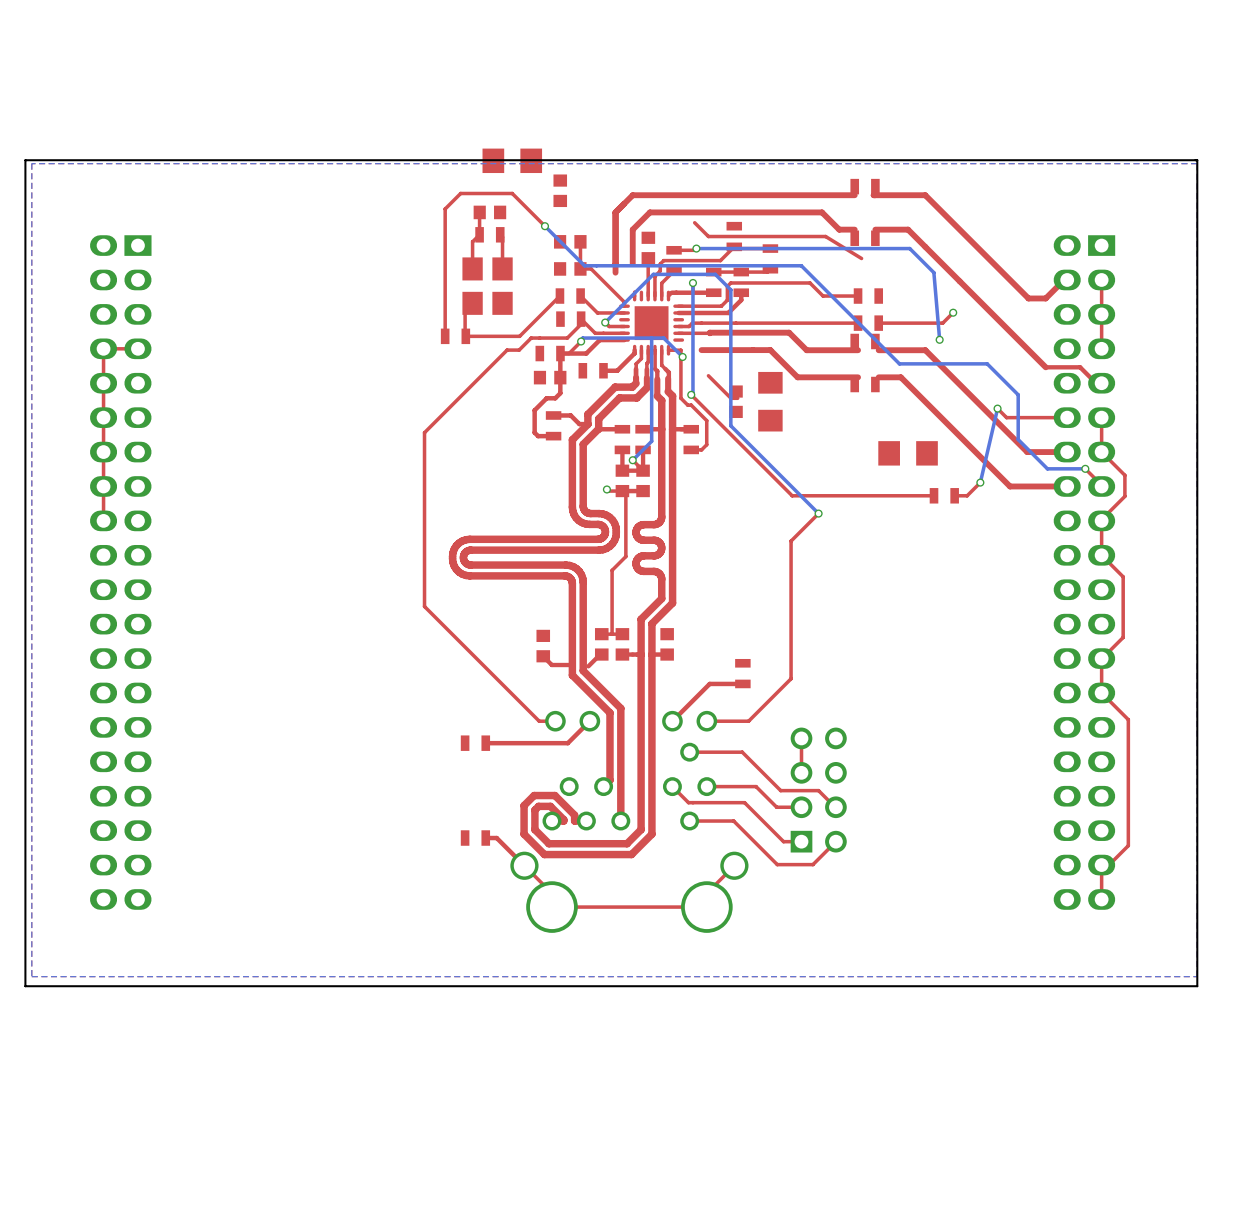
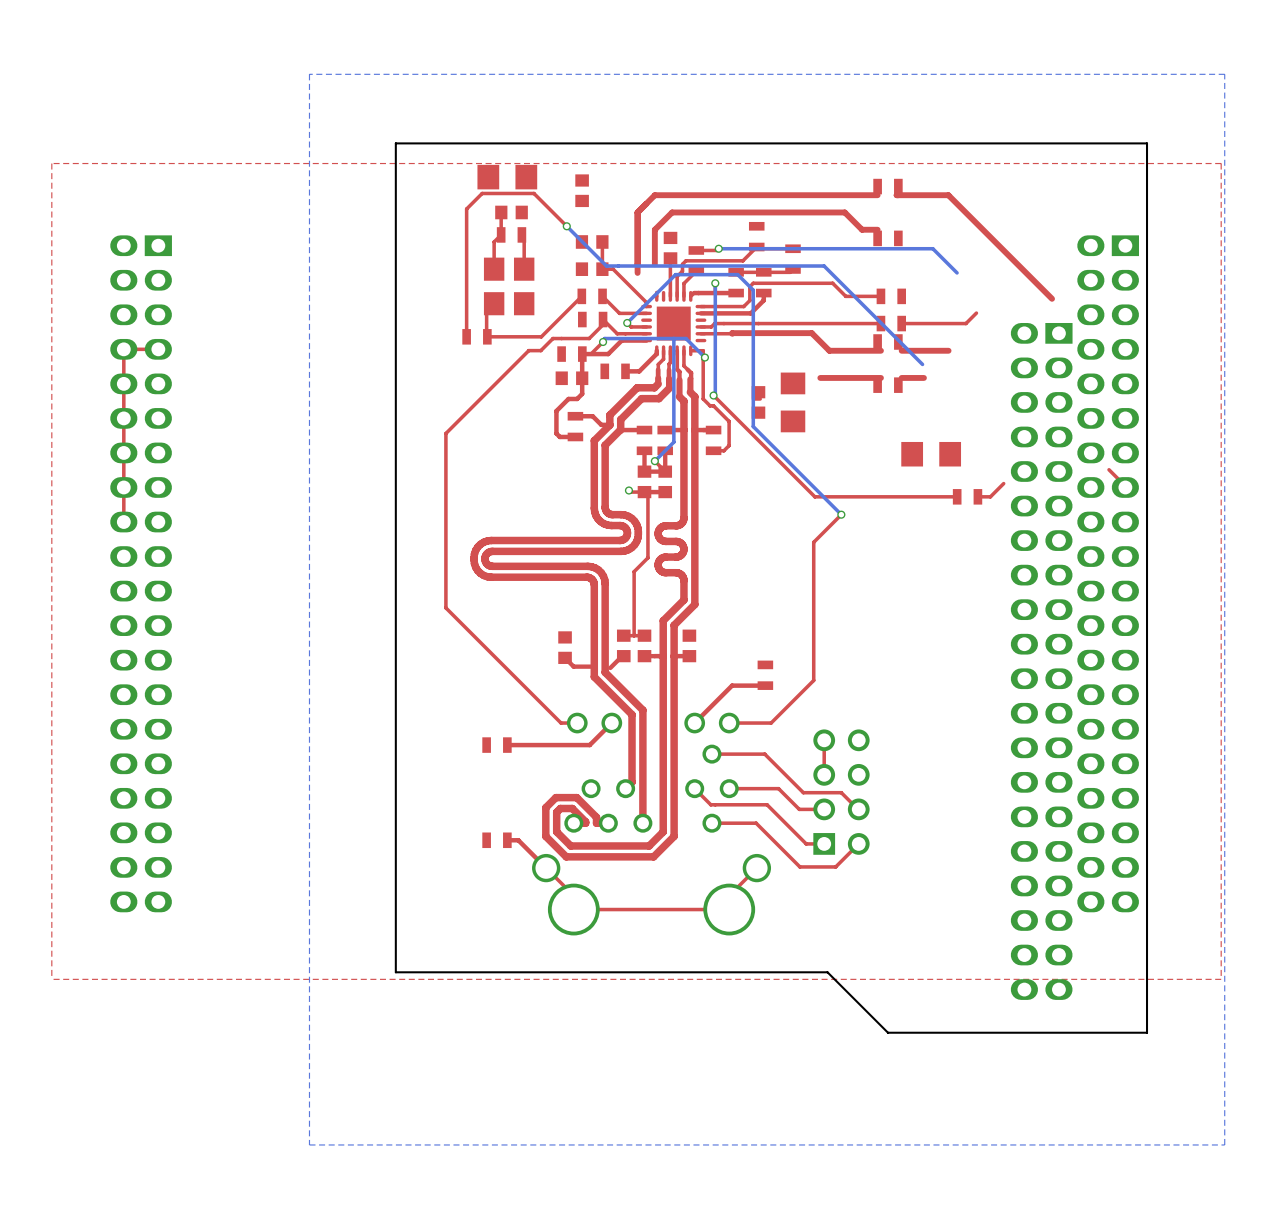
part position: (512, 160) -> (507, 177)
board edge: (1197, 160) (25, 160) (25, 986) (1197, 986) (1197, 160) -> (1147, 143) (1147, 1032) (887, 1032) (827, 972) (395, 972) (395, 143) (1147, 143)
bottom zone outline: (1197, 163) (1197, 976) (31, 976) (31, 163) (1197, 163) -> (1224, 74) (1224, 1144) (309, 1144) (309, 74) (1224, 74)
top track: (694, 222) (708, 236) (825, 236) (861, 258) -> none
top track: (875, 229) (908, 229) (1045, 367) (1080, 367) (1096, 383) (1101, 383) -> none
bottom track: (933, 272) (939, 339) -> none
top track: (1067, 279) (1064, 279) (1045, 298) (1028, 298) -> none
top track: (1101, 279) (1101, 348) -> none
via: (953, 312) -> none
via: (939, 339) -> none
top track: (701, 350) (770, 350) (797, 377) -> none
top track: (925, 350) (1027, 452) (1067, 452) -> none
bottom track: (899, 363) (987, 363) (1018, 394) (1018, 439) (1047, 468) (1085, 468) -> none
top track: (708, 375) (730, 398) -> none
top track: (900, 377) (1010, 486) (1067, 486) -> none
top track: (997, 408) (1006, 417) (1067, 417) -> none
bottom track: (997, 408) (980, 482) -> none
via: (997, 408) -> none
top track: (1101, 417) (1101, 452) (1124, 475) (1124, 496) (1101, 519) (1101, 555) (1123, 576) (1123, 637) (1101, 658) (1101, 692) (1128, 719) (1128, 845) (1108, 865) (1101, 865) (1101, 899) -> none
via: (1085, 468) -> none
via: (980, 482) -> none
part: none -> (1041, 661)

